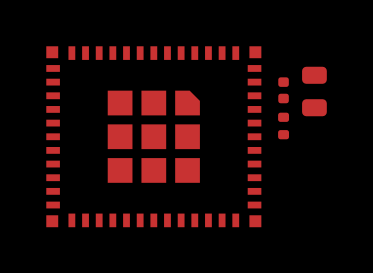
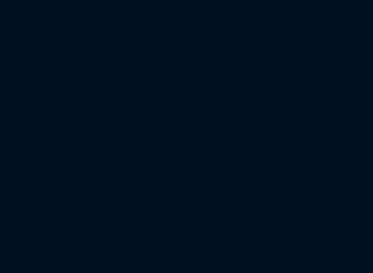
part: (283, 90) -> none
part: (314, 91) -> none
part: (283, 125) -> none
part: (153, 136) -> none

